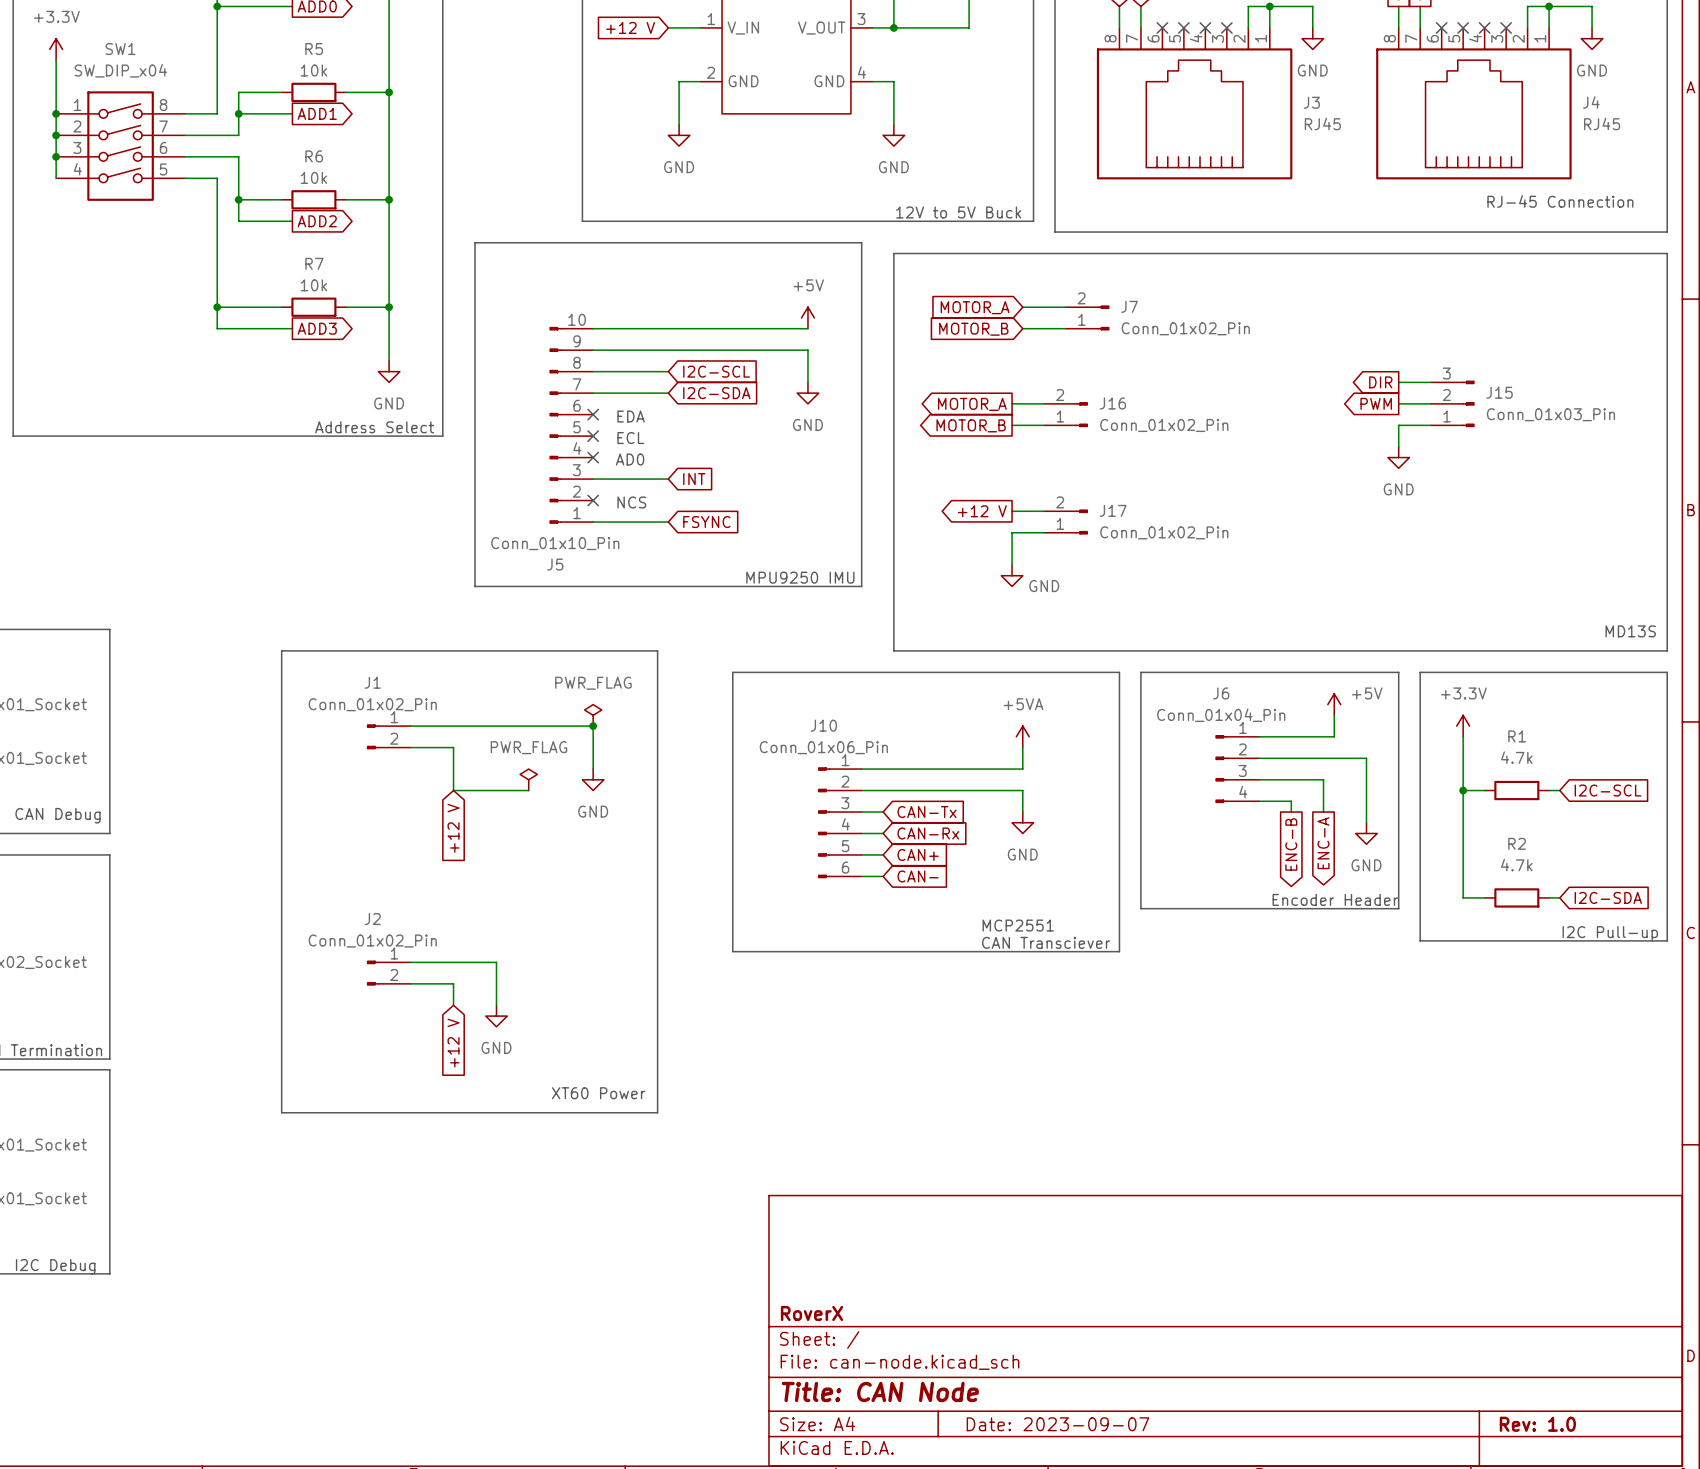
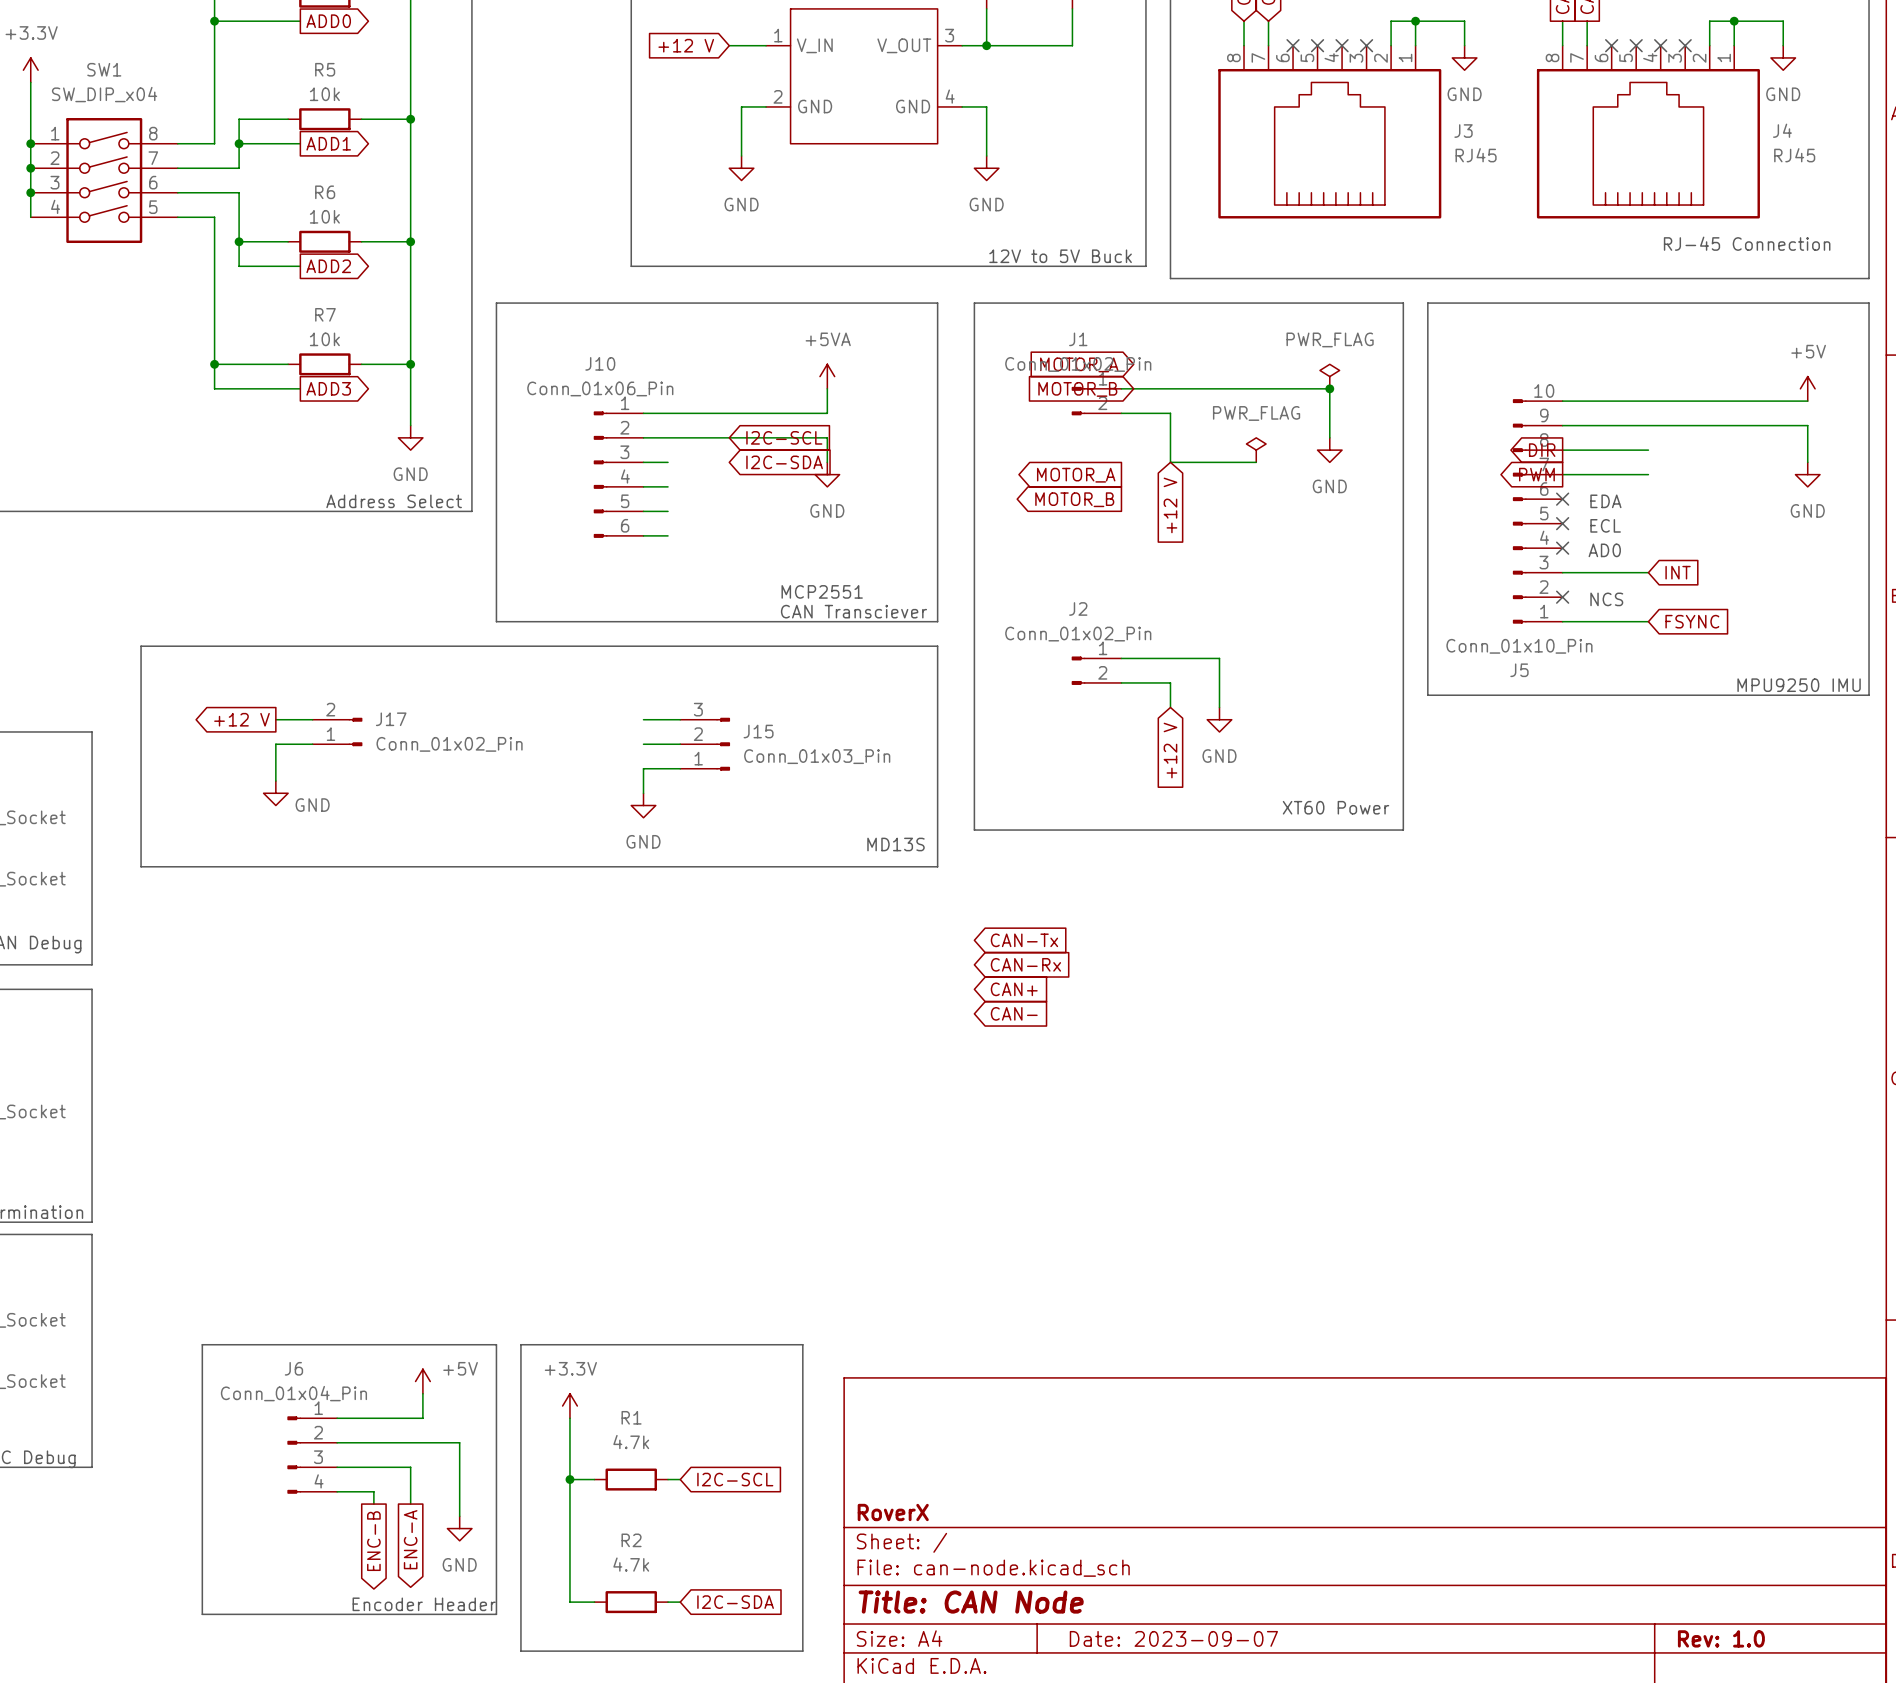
line: (475, 242) (861, 242) (861, 586) (475, 586) (475, 242) -> (496, 303) (496, 621) (937, 621) (937, 303) (496, 303)
line: (893, 253) (893, 650) (1667, 650) (1667, 597) -> (1427, 303) (1427, 695) (1869, 695)
line: (1259, 253) (1280, 253) -> (1403, 303) (1403, 830) (974, 830) (974, 303) (986, 303)
wire: (1022, 307) (1065, 307) -> none
power symbol: none -> +5VA (827, 376)
power symbol: +5V (807, 317) -> none
J7: Conn_01x02_Pin (1087, 317) -> none
power symbol: none -> PWR_FLAG (1329, 376)
wire: (593, 328) (807, 328) -> none
wire: none -> (1121, 388) (1133, 388)
wire: none -> (1182, 388) (1329, 388) (1329, 437)
junction: none -> (1329, 388)
power symbol: none -> +5V (1807, 388)
wire: none -> (1562, 401) (1807, 401)
wire: (754, 350) (807, 350) (807, 382) -> (827, 413) (827, 388)
wire: none -> (1121, 413) (1170, 413) (1170, 462) (1256, 462)
wire: none -> (1562, 425) (1807, 425) (1807, 462)
wire: none -> (729, 437) (827, 437) (827, 462)
power symbol: none -> PWR_FLAG (1256, 450)
power symbol: none -> GND (1329, 450)
wire: (614, 393) (668, 393) -> none
power symbol position: GND (807, 393) -> GND (827, 474)
wire: (1012, 403) (1044, 403) -> none
J15 position: (1452, 403) -> (705, 744)
power symbol: none -> GND (1807, 474)
wire: none -> (643, 486) (668, 486)
no-connect mark: (593, 414) -> none
J16: Conn_01x02_Pin (1066, 414) -> none
text: EDA (631, 416) -> none
J5 position: (571, 425) -> (1537, 511)
wire: (1012, 425) (1044, 425) -> none
no-connect mark: none -> (1562, 499)
wire: (1430, 425) (1398, 425) (1398, 446) -> none
text: none -> EDA (1605, 501)
global label: none -> +12 V (1170, 505)
wire: none -> (643, 511) (668, 511)
no-connect mark: (593, 436) -> none
text: ECL (630, 438) -> none
no-connect mark: none -> (1562, 523)
text: none -> ECL (1605, 525)
wire: none -> (643, 535) (668, 535)
no-connect mark: (593, 457) -> none
power symbol: GND (1398, 457) -> none
text: AD0 (630, 459) -> none
no-connect mark: none -> (1562, 548)
text: none -> AD0 (1604, 550)
wire: (593, 479) (668, 479) -> none
global label: INT (694, 479) -> none
wire: none -> (1562, 572) (1648, 572)
global label: none -> INT (1678, 572)
no-connect mark: (593, 500) -> none
text: NCS (631, 502) -> none
text: none -> MCP2551 (822, 591)
global label: +12 V (982, 511) -> none
wire: (1012, 511) (1044, 511) -> none
no-connect mark: none -> (1562, 597)
text: none -> NCS (1606, 599)
wire: (593, 522) (668, 522) -> none
global label: FSYNC (706, 522) -> none
J17 position: (1066, 522) -> (337, 731)
text: none -> CAN Transciever (853, 611)
wire: (1044, 532) (1012, 532) (1012, 564) -> (1219, 707) (1219, 658) (1121, 658)
wire: none -> (1562, 621) (1648, 621)
global label: none -> FSYNC (1692, 621)
line: none -> (141, 646) (937, 646) (937, 866) (141, 866) (141, 646)
power symbol position: GND (1012, 575) -> GND (1219, 719)
text: MPU9250 IMU (800, 577) -> none
wire: none -> (1121, 682) (1170, 682) (1170, 707)
power symbol text position: GND (1044, 586) -> GND (1219, 756)
text: none -> MPU9250 IMU (1799, 685)
global label: none -> +12 V (241, 719)
wire: none -> (275, 719) (312, 719)
wire: none -> (643, 719) (680, 719)
text: MD13S (1630, 631) -> none
wire: none -> (312, 744) (275, 744) (275, 781)
wire: none -> (643, 744) (680, 744)
global label: none -> +12 V (1170, 750)
line: (281, 650) (657, 650) (657, 1112) (281, 1112) (281, 650) -> none
wire: none -> (680, 768) (643, 768) (643, 793)
line: (732, 672) (1119, 672) (1119, 951) (732, 951) (732, 672) -> none
line: (1140, 672) (1398, 672) (1398, 908) (1140, 908) (1140, 672) -> none
line: (1420, 672) (1667, 672) (1667, 940) (1420, 940) (1420, 672) -> none
power symbol: none -> GND (275, 793)
text: none -> XT60 Power (1336, 807)
power symbol: +5V (1334, 704) -> none
power symbol: PWR_FLAG (593, 715) -> none
wire: (1334, 715) (1334, 736) (1259, 736) -> none
wire: (410, 726) (593, 726) (593, 769) -> none
junction: (593, 726) -> none
power symbol: +3.3V (1463, 726) -> none
text: none -> MD13S (895, 844)
J1 position: (388, 736) -> (1096, 401)
power symbol: +5VA (1022, 736) -> none
wire: (1463, 736) (1463, 897) (1484, 897) -> none
wire: (410, 747) (453, 747) (453, 790) (528, 790) -> none
wire: (1022, 747) (1022, 769) (861, 769) -> none
wire: (1259, 758) (1366, 758) (1366, 822) -> none
J6 position: (1237, 769) -> (312, 1455)
power symbol: PWR_FLAG (528, 779) -> none
power symbol position: GND (593, 779) -> GND (643, 805)
wire: (1259, 779) (1323, 779) (1323, 812) -> none
wire: (861, 790) (1022, 790) (1022, 812) -> none
wire: (1463, 790) (1484, 790) -> none
junction: (1463, 790) -> none
R1 position: (1516, 790) -> (631, 1479)
wire: (1549, 790) (1559, 790) -> none
global label: I2C-SCL (1608, 790) -> none
wire: (1259, 801) (1291, 801) (1291, 812) -> none
wire: (861, 812) (883, 812) -> none
J10 position: (839, 822) -> (618, 474)
power symbol: GND (1022, 822) -> none
global label: +12 V (453, 828) -> none
wire: (861, 833) (883, 833) -> none
power symbol: GND (1366, 833) -> none
global label: ENC-A (1323, 843) -> none
global label: ENC-B (1291, 844) -> none
wire: (861, 854) (883, 854) -> none
wire: (861, 876) (883, 876) -> none
R2 position: (1516, 897) -> (631, 1602)
wire: (1549, 897) (1559, 897) -> none
global label: I2C-SDA (1608, 897) -> none
text: Encoder Header (1335, 899) -> none
text: MCP2551 (1018, 925) -> none
text: I2C Pull-up (1610, 933) -> none
text: CAN Transciever (1046, 942) -> none
wire: (410, 962) (496, 962) (496, 1005) -> none
J2 position: (388, 973) -> (1096, 670)
wire: (410, 983) (453, 983) (453, 1005) -> none
power symbol: GND (496, 1016) -> none
global label: +12 V (453, 1043) -> none
text: XT60 Power (598, 1093) -> none
line: none -> (202, 1344) (496, 1344) (496, 1614) (202, 1614) (202, 1344)
line: none -> (520, 1344) (802, 1344) (802, 1651) (520, 1651) (520, 1344)
power symbol: none -> +5V (422, 1381)
wire: none -> (422, 1393) (422, 1418) (337, 1418)
power symbol: none -> +3.3V (569, 1406)
wire: none -> (569, 1418) (569, 1602) (594, 1602)
wire: none -> (337, 1442) (459, 1442) (459, 1516)
wire: none -> (337, 1467) (410, 1467) (410, 1504)
wire: none -> (569, 1479) (594, 1479)
junction: none -> (569, 1479)
wire: none -> (668, 1479) (680, 1479)
global label: none -> I2C-SCL (735, 1479)
wire: none -> (337, 1491) (373, 1491) (373, 1504)
power symbol: none -> GND (459, 1528)
global label: none -> ENC-A (410, 1539)
global label: none -> ENC-B (373, 1541)
wire: none -> (668, 1602) (680, 1602)
global label: none -> I2C-SDA (735, 1602)
text: none -> Encoder Header (424, 1604)

